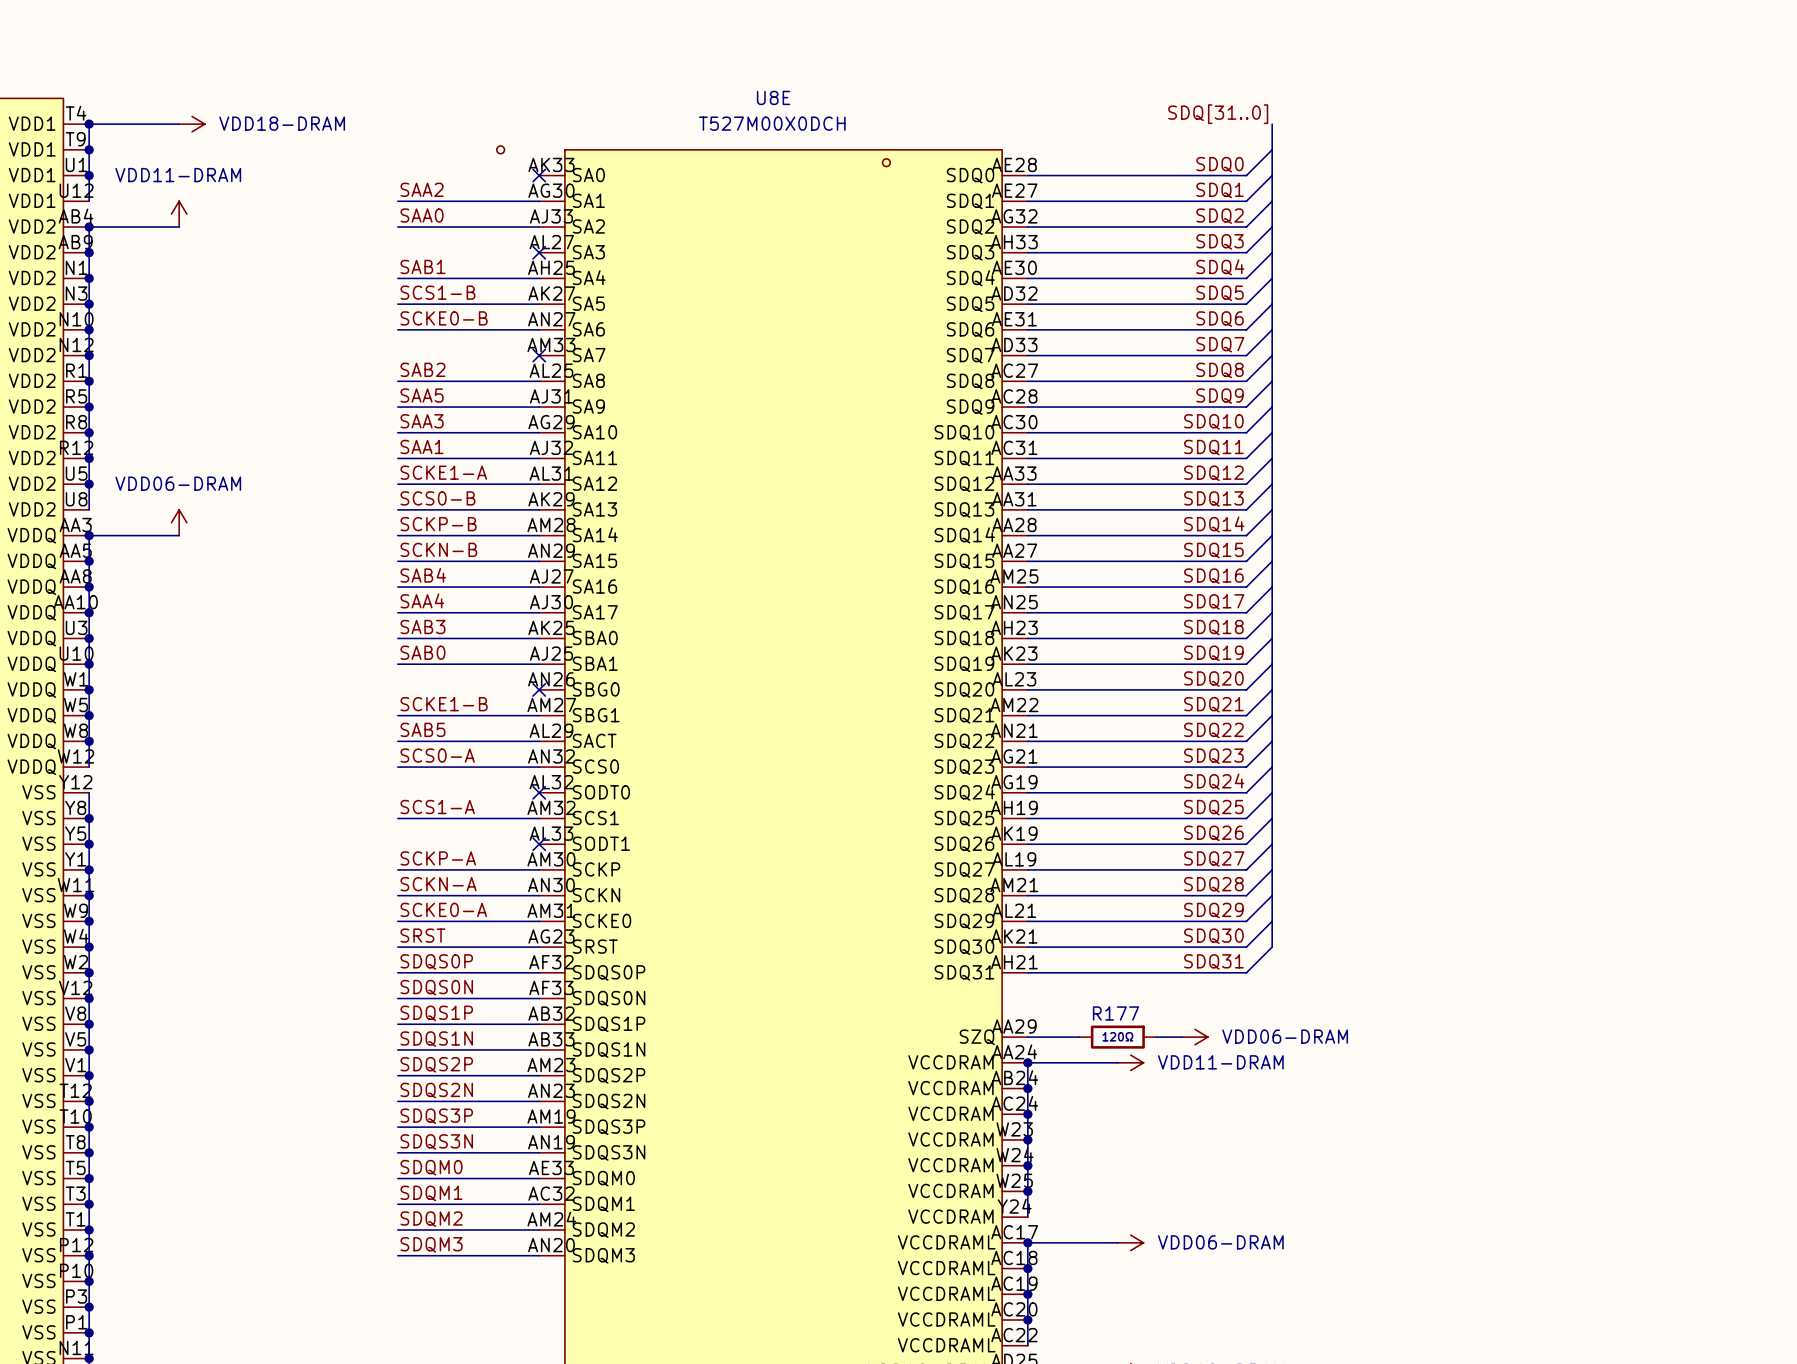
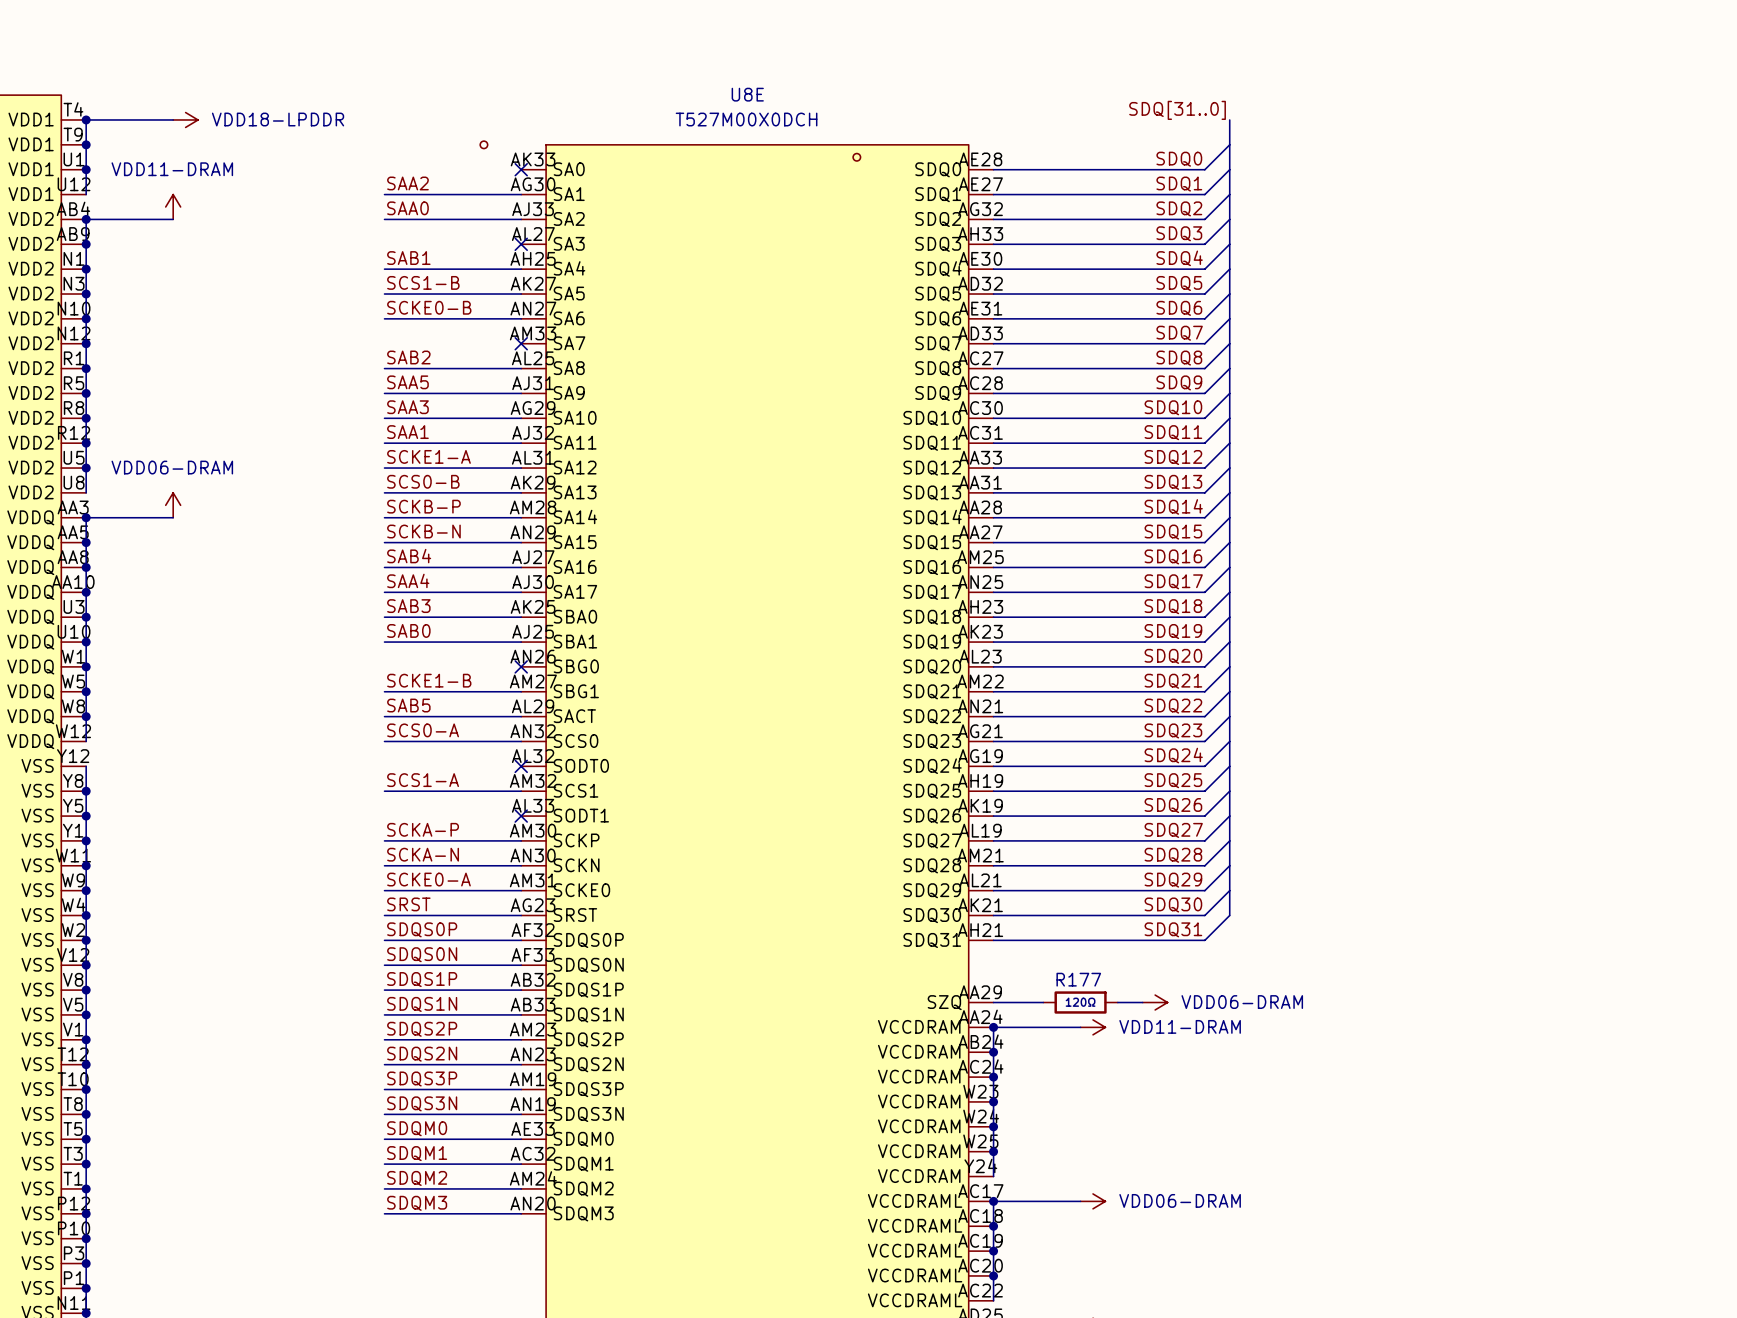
power symbol: VDD18-DRAM (192, 124) -> VDD18-LPDDR (185, 119)
label: SCKP-B (438, 524) -> SCKB-P (423, 506)
label: SCKN-B (438, 549) -> SCKB-N (423, 531)
label: SCKP-A (438, 858) -> SCKA-P (423, 829)
label: SCKN-A (438, 884) -> SCKA-N (423, 854)

